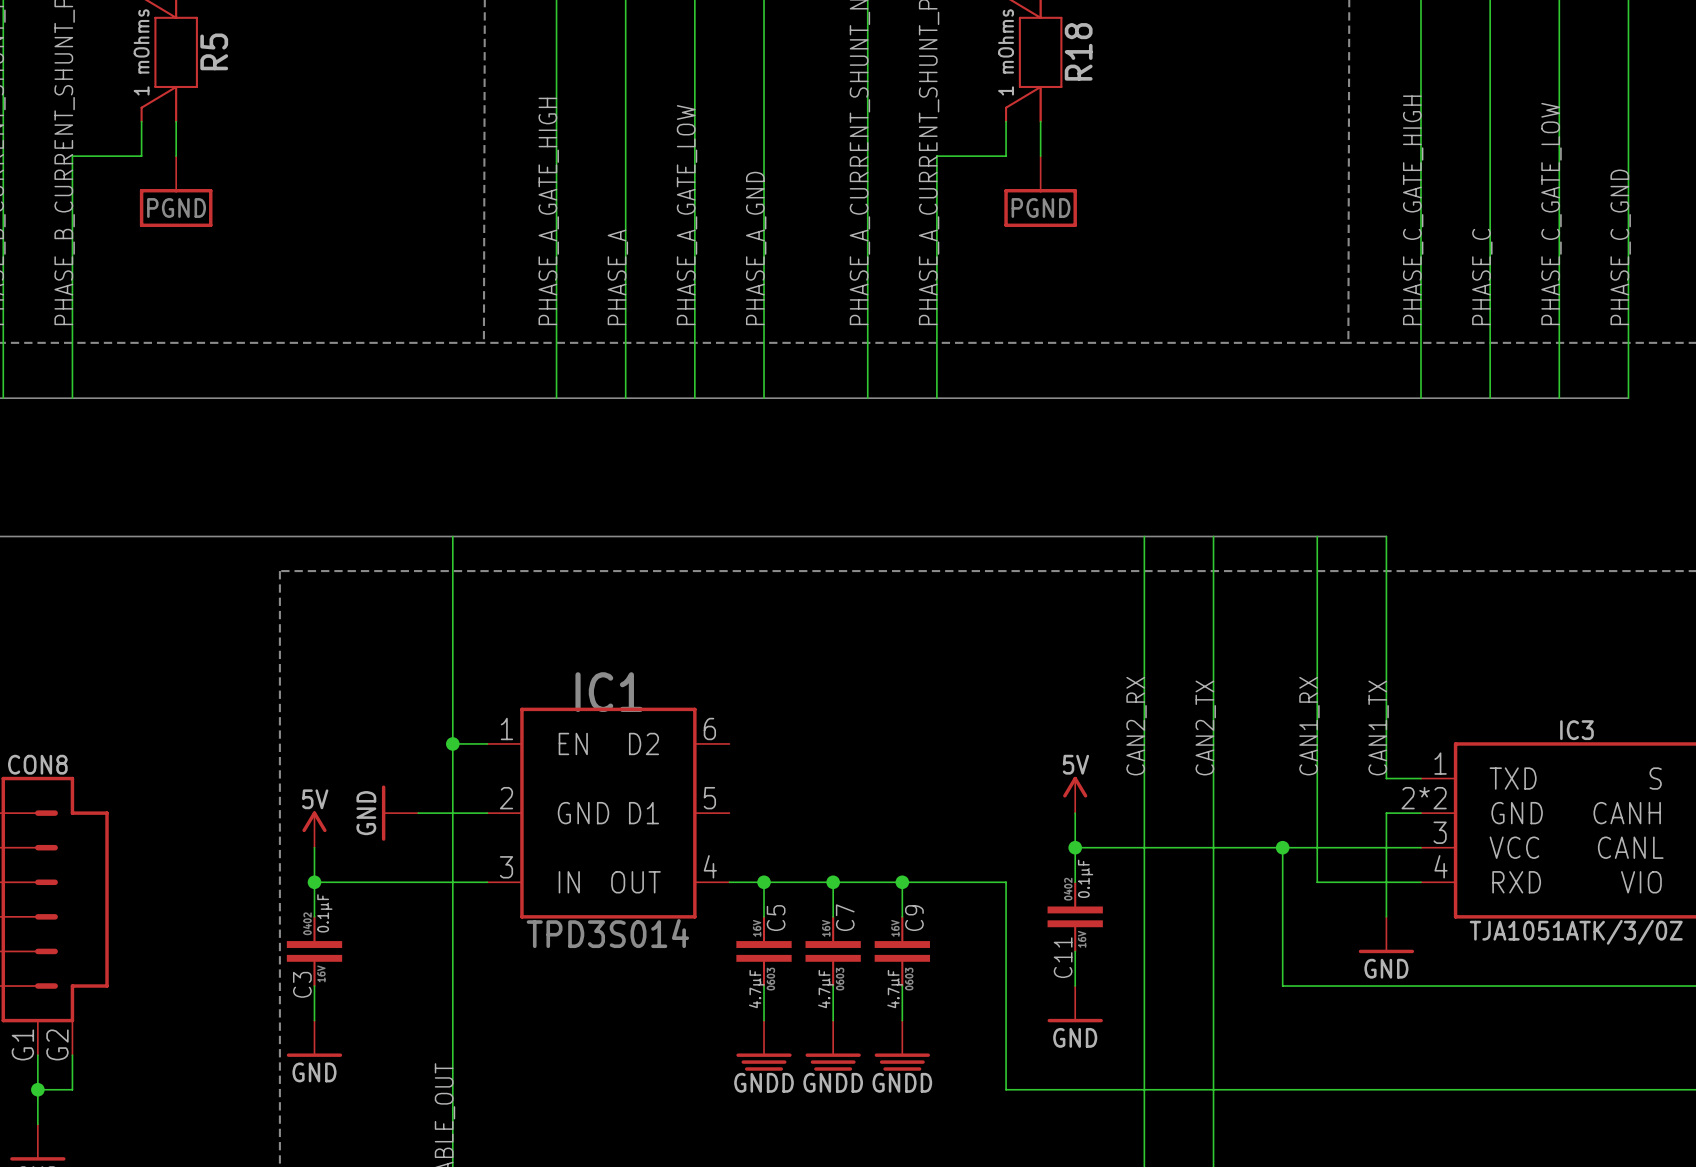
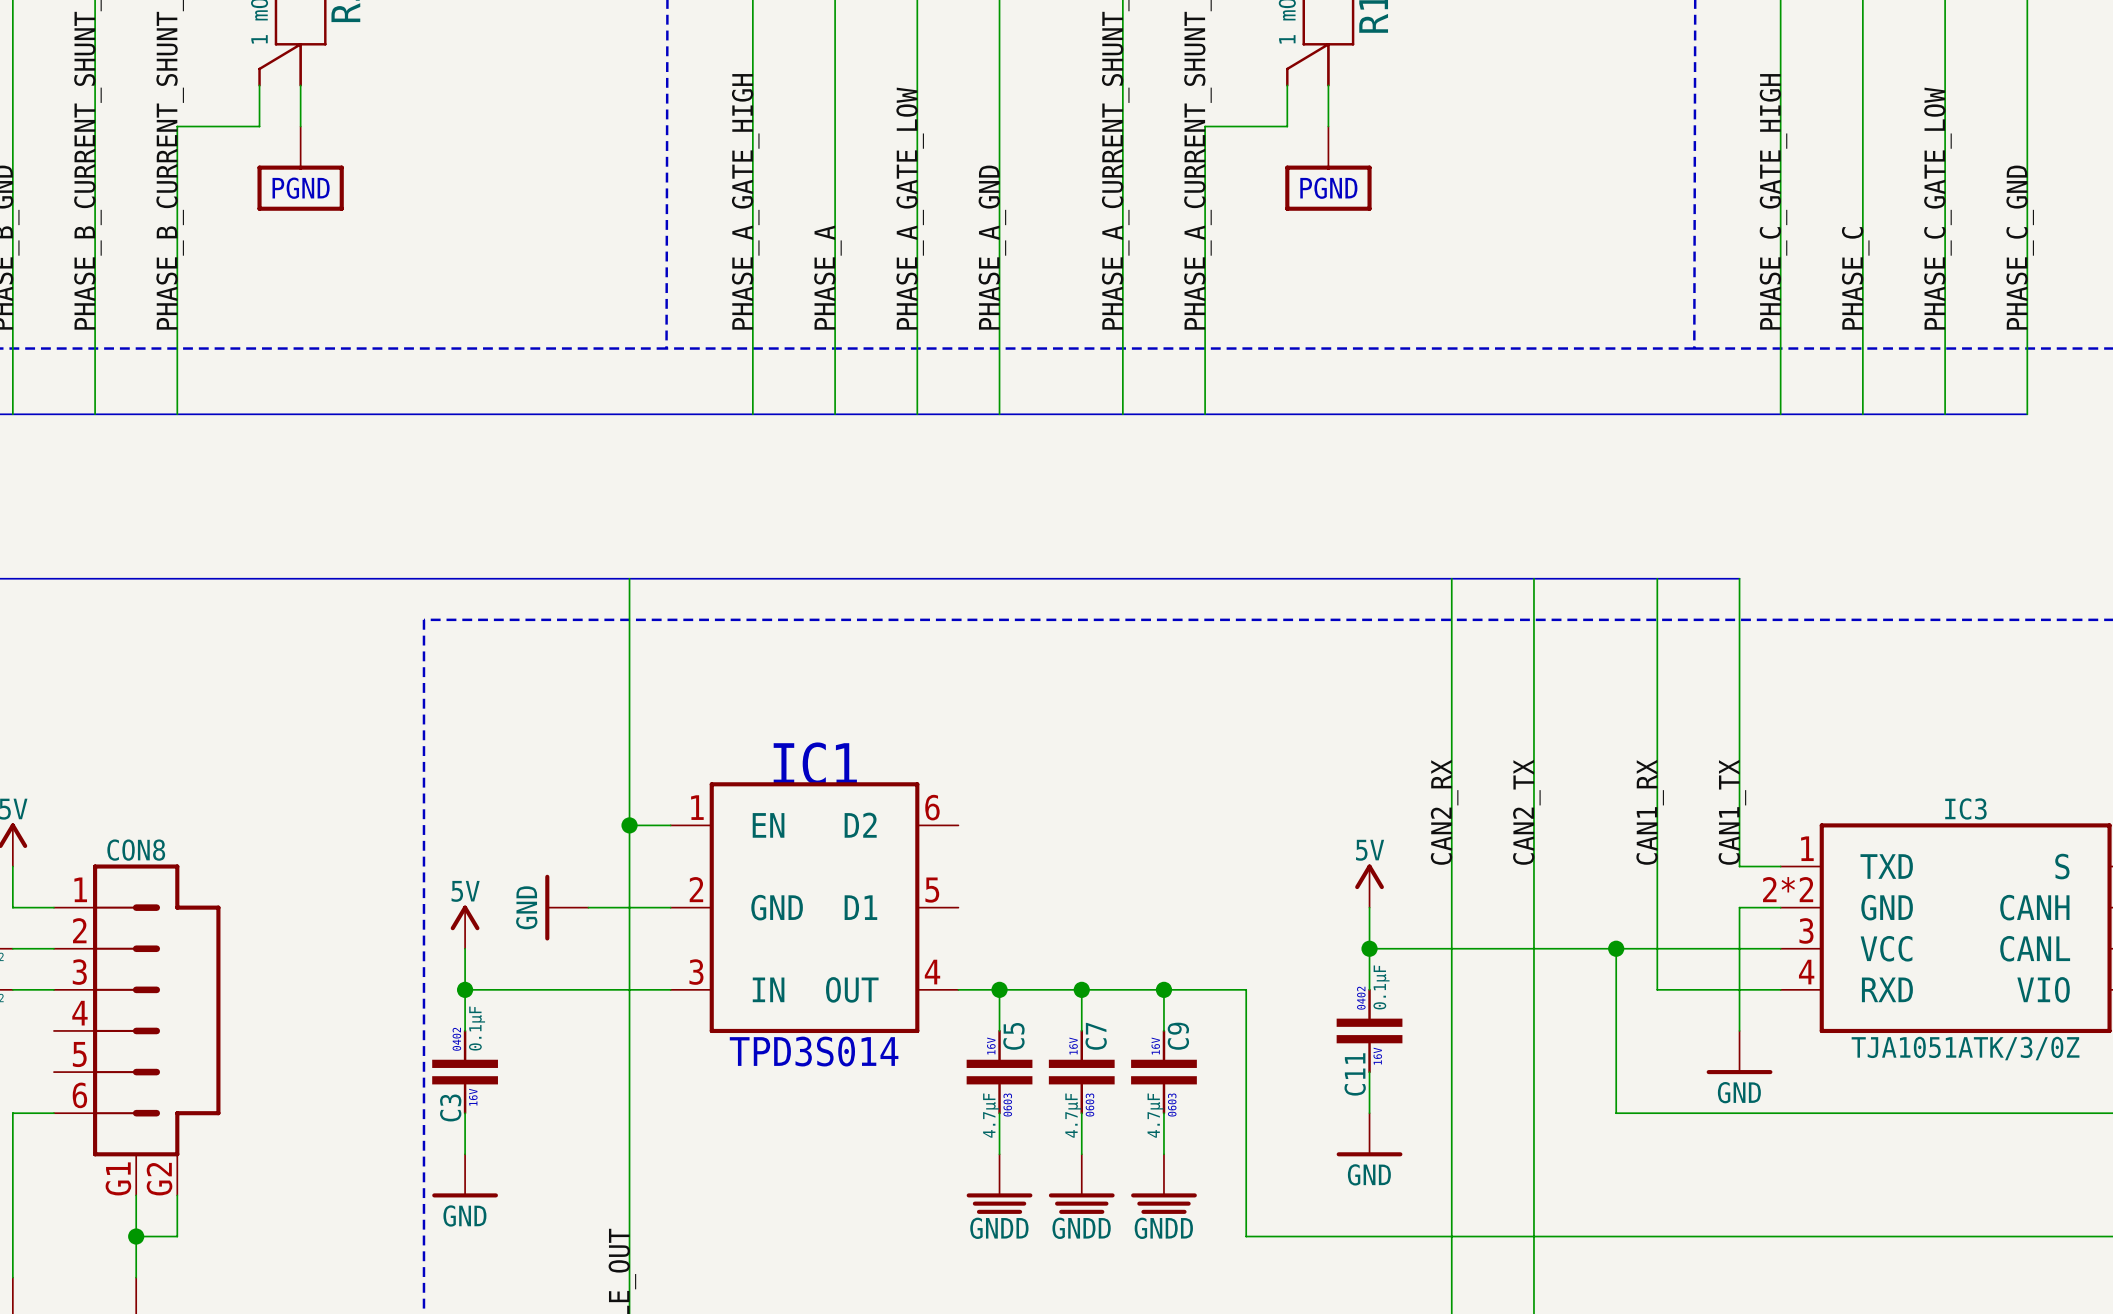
wire: (971, 882) (1006, 882) (1006, 1089) -> (1246, 989) (1246, 1236) (1287, 1236)

